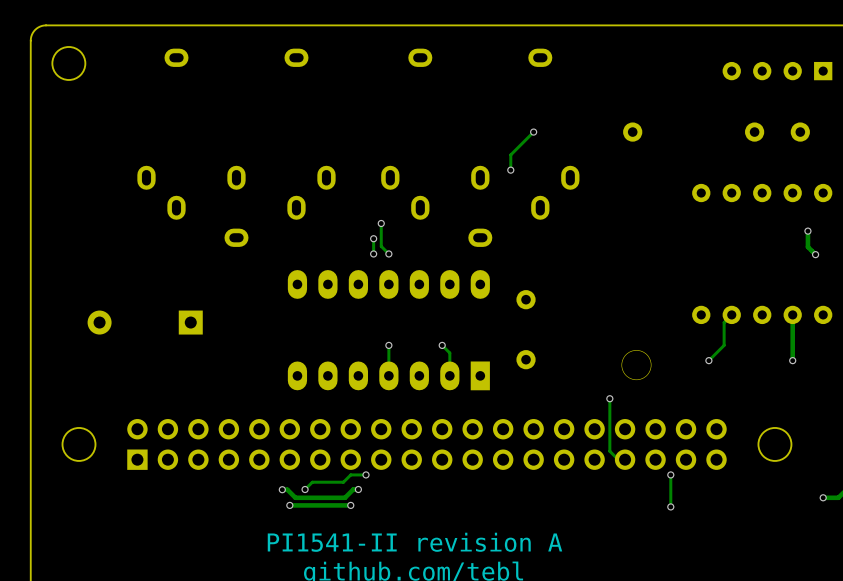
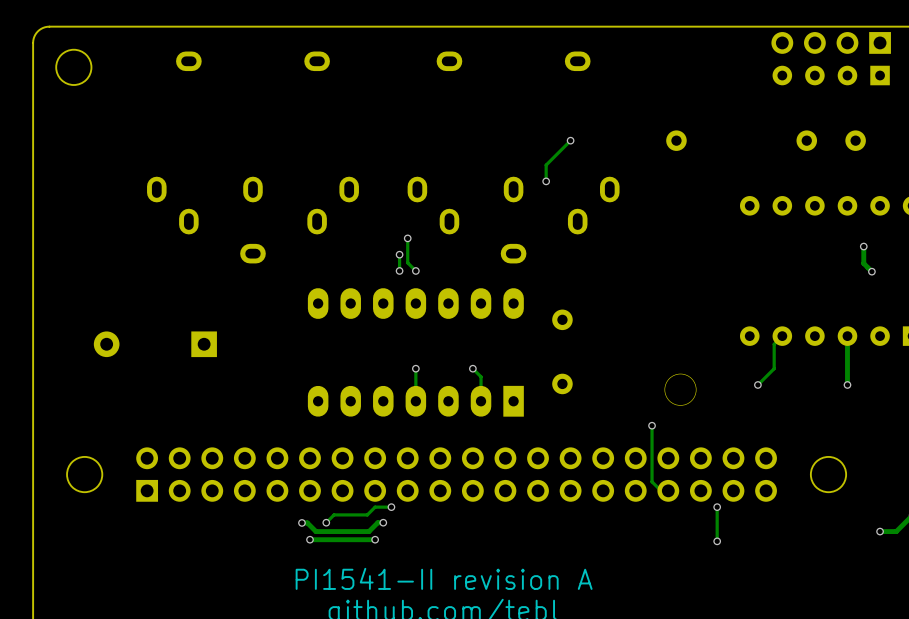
part: none -> (831, 42)

